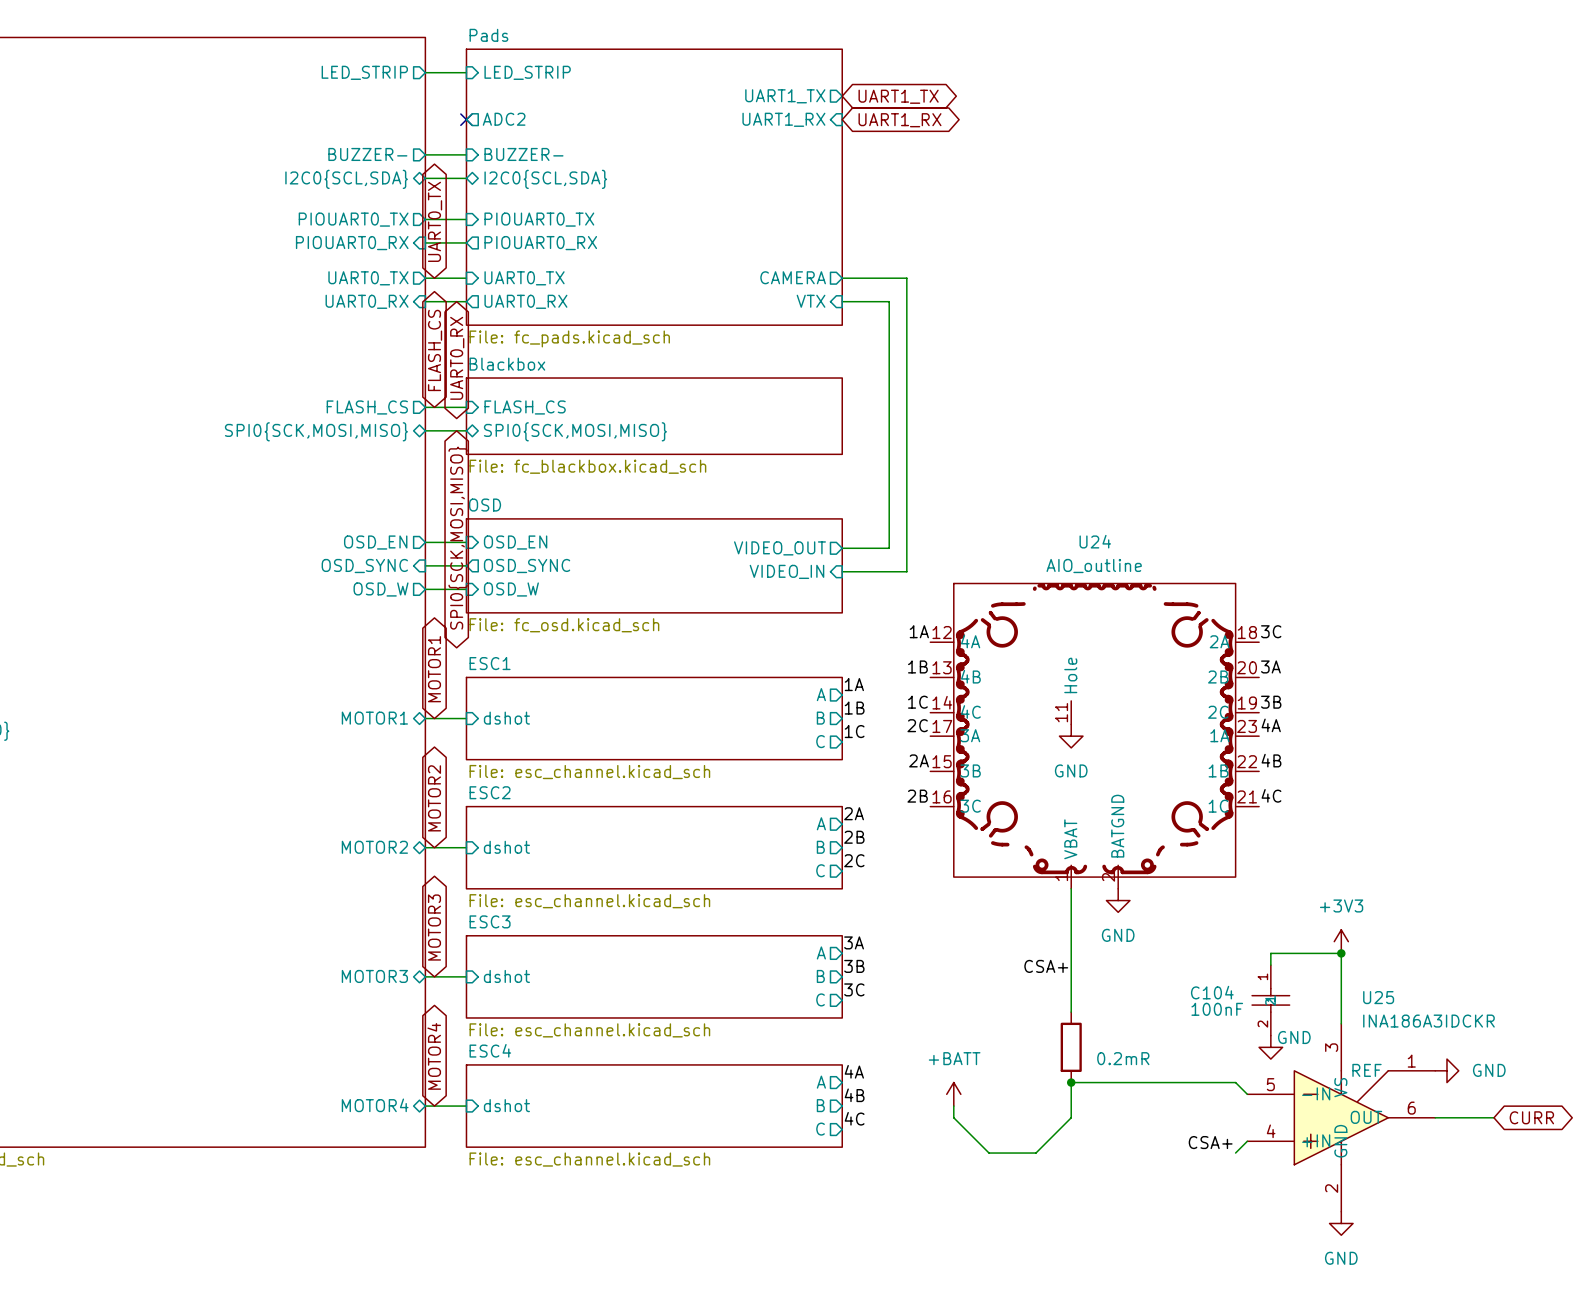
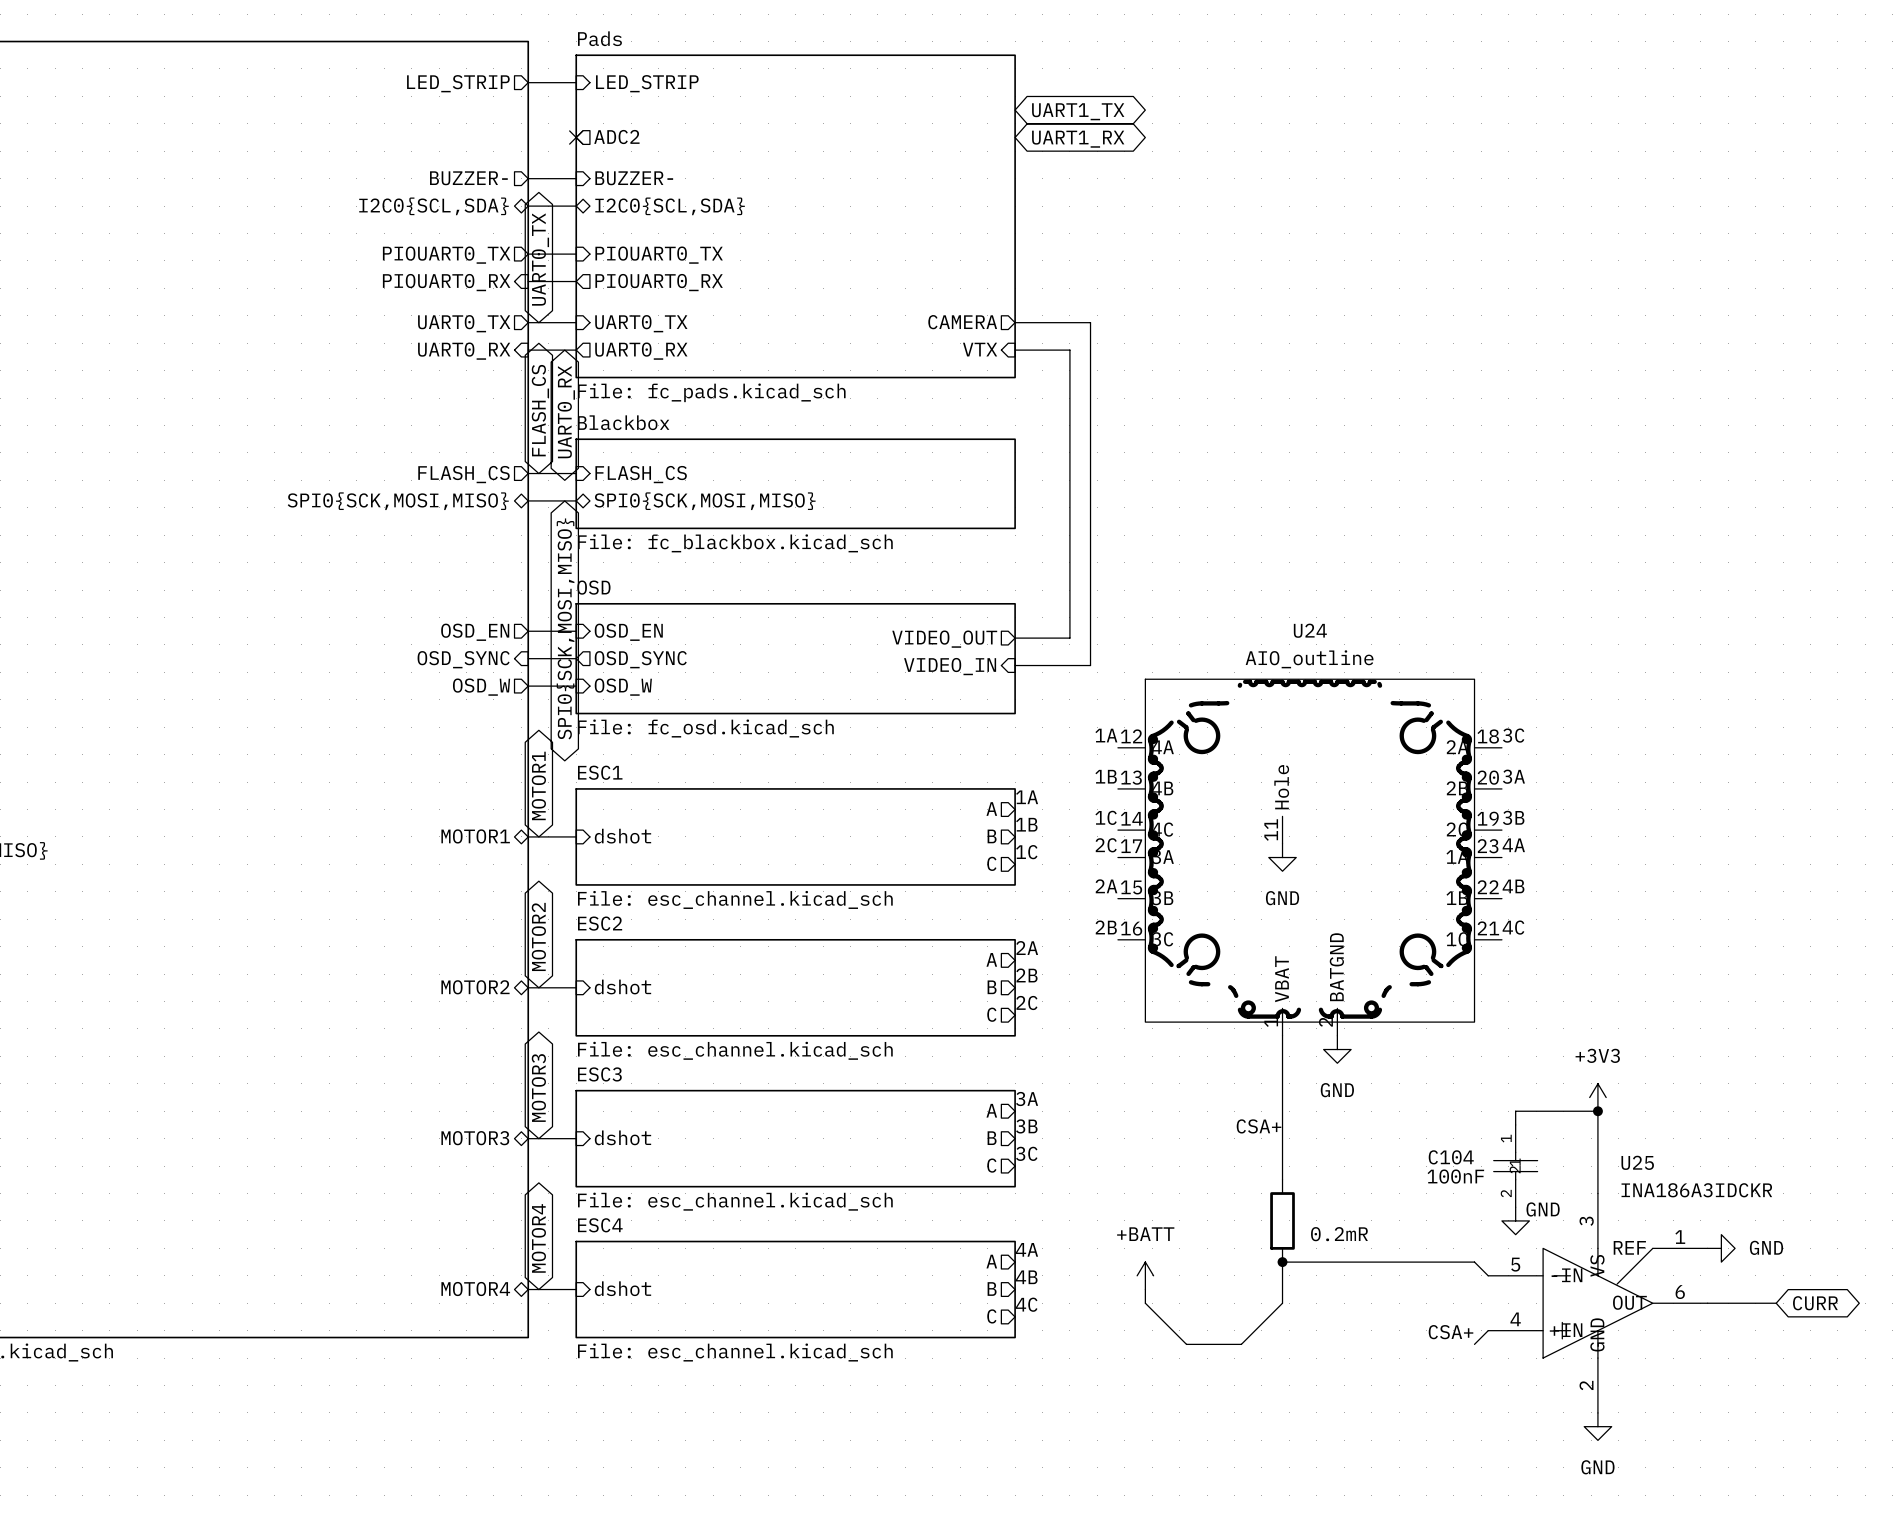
sheet pin: UART1_TX (785, 96) -> none
sheet pin: UART1_RX (783, 119) -> none

